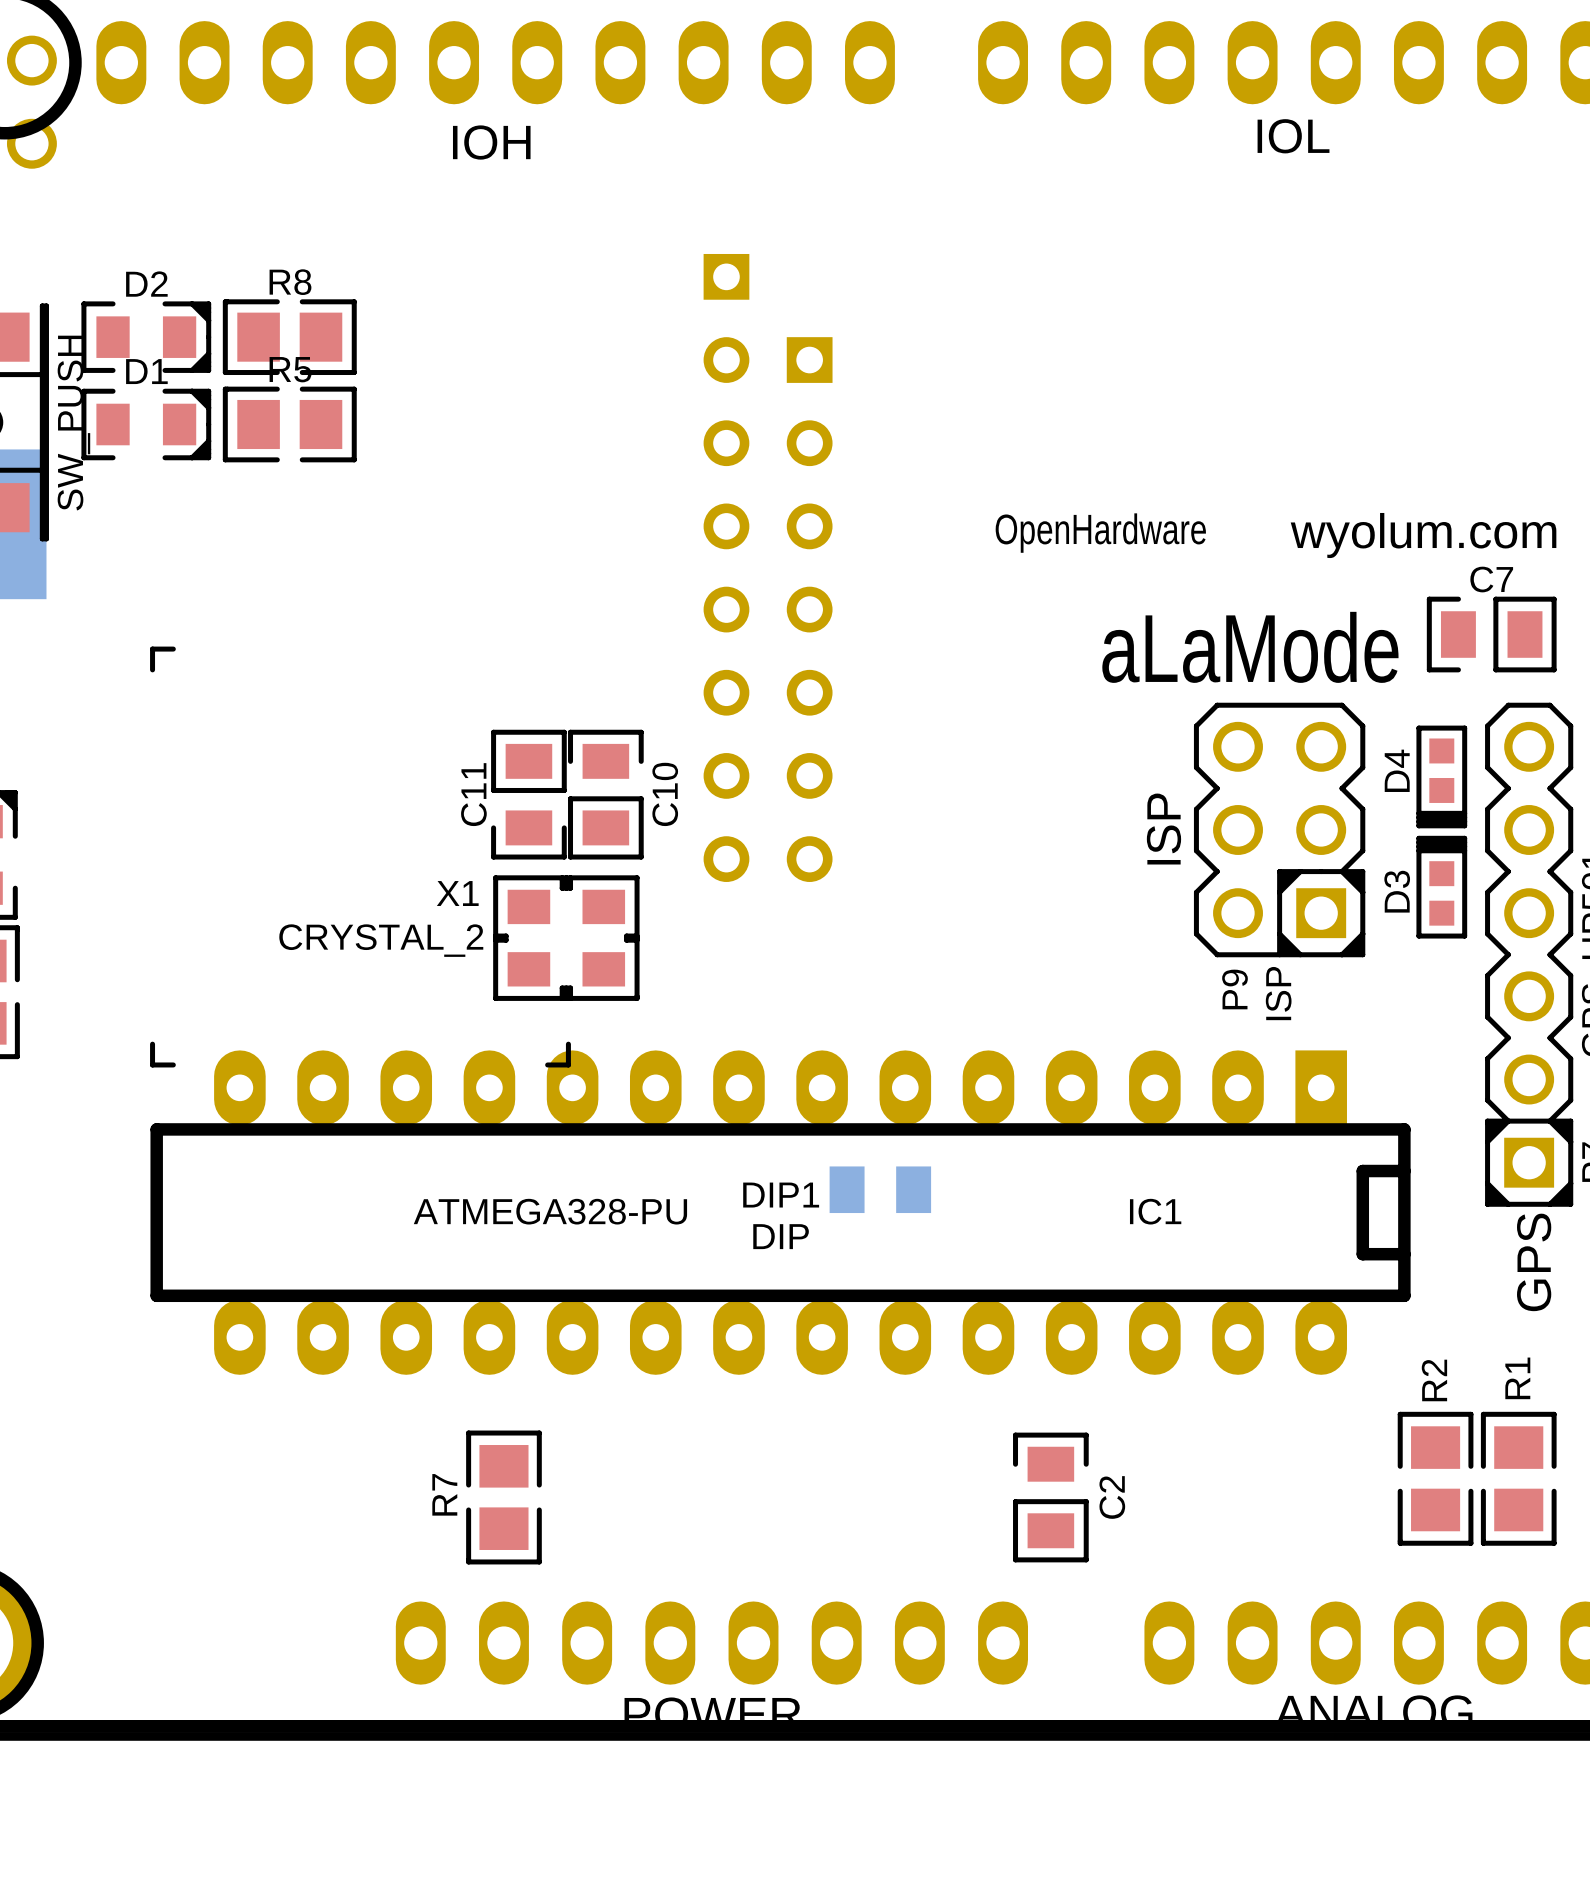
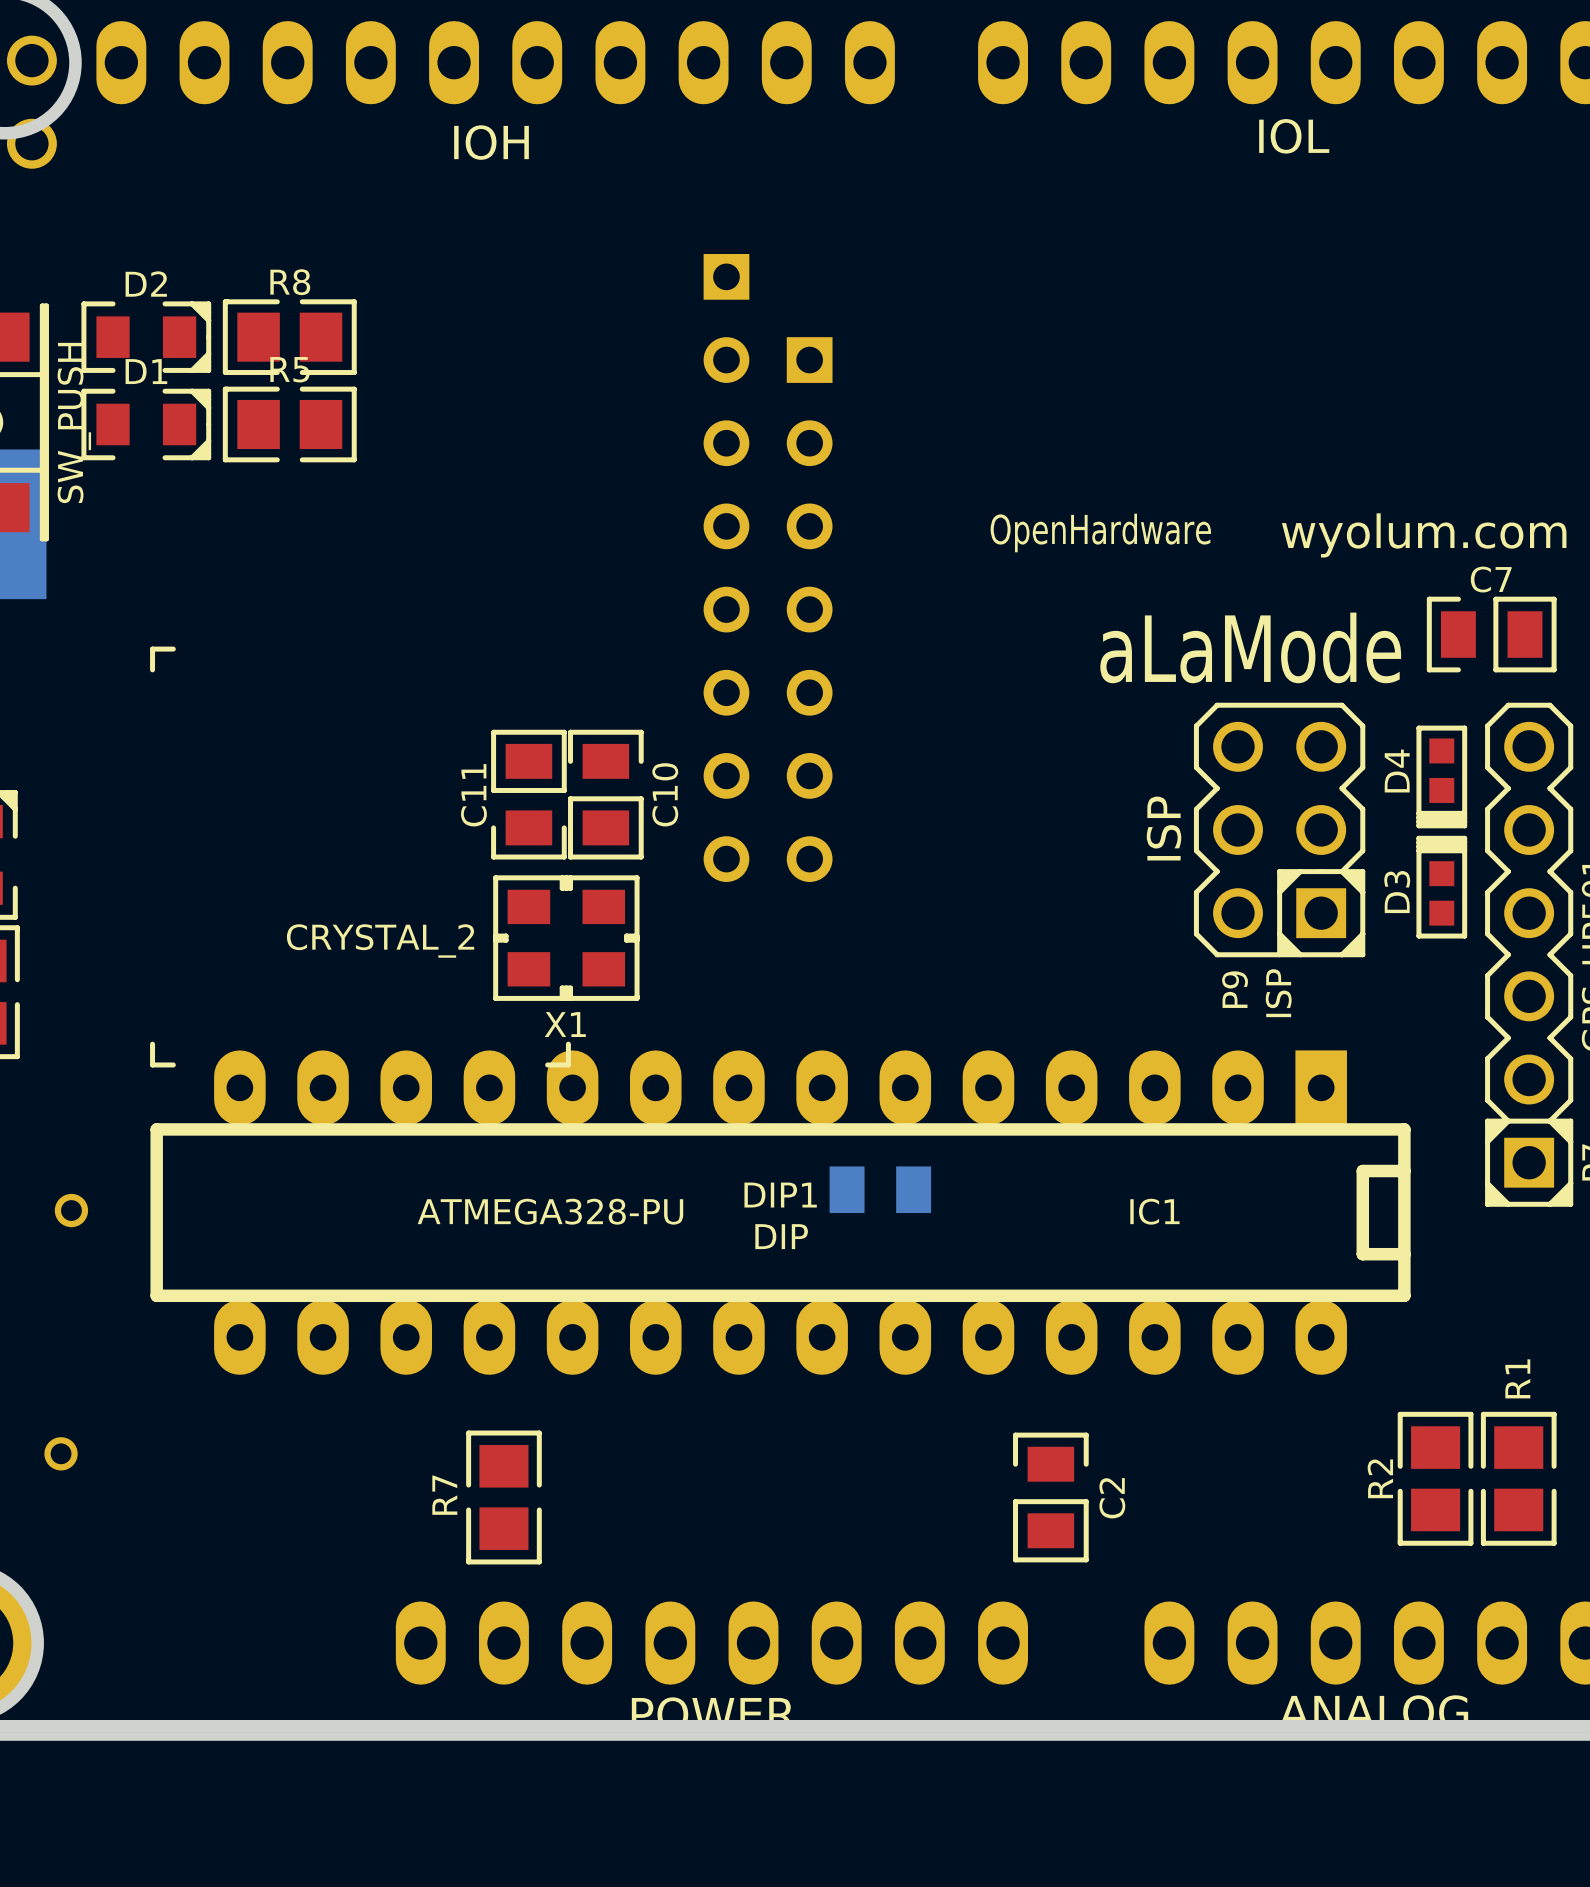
X1 name position: X1 (457, 893) -> X1 (565, 1024)
part: none -> (71, 1210)
text: GPS (1534, 1262) -> none
R2 name position: R2 (1434, 1380) -> R2 (1380, 1478)
part: none -> (61, 1453)

